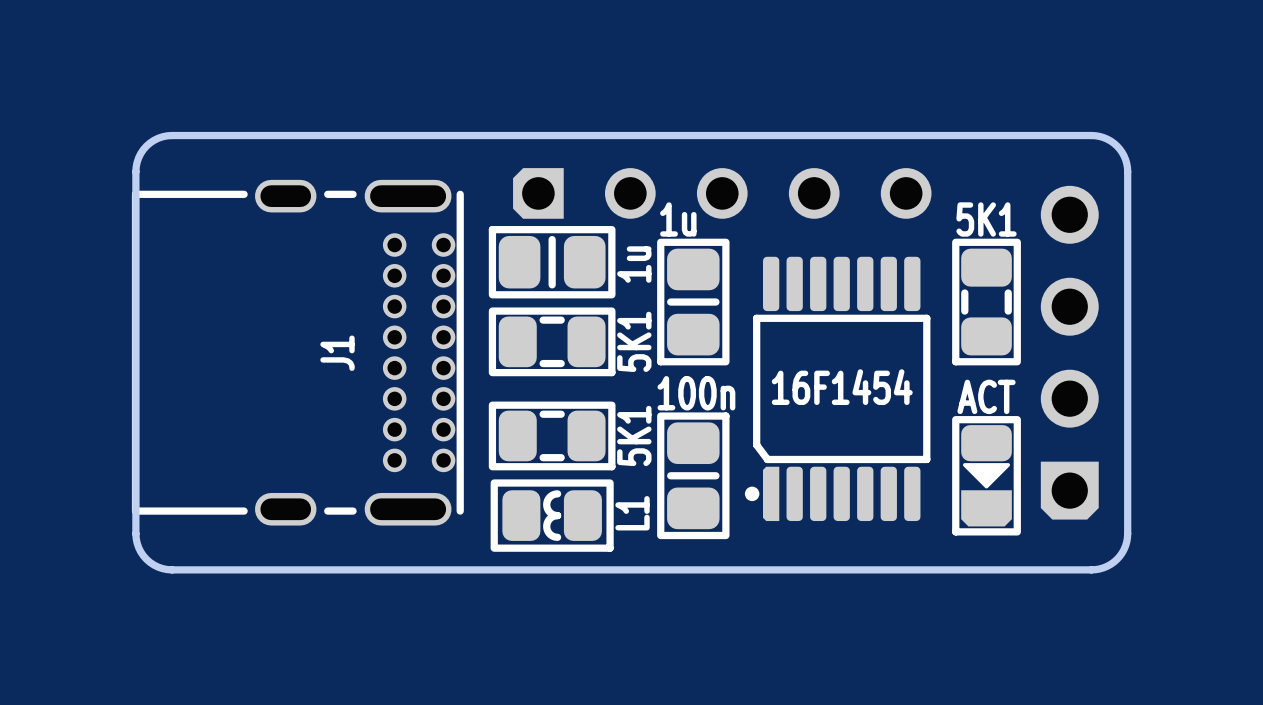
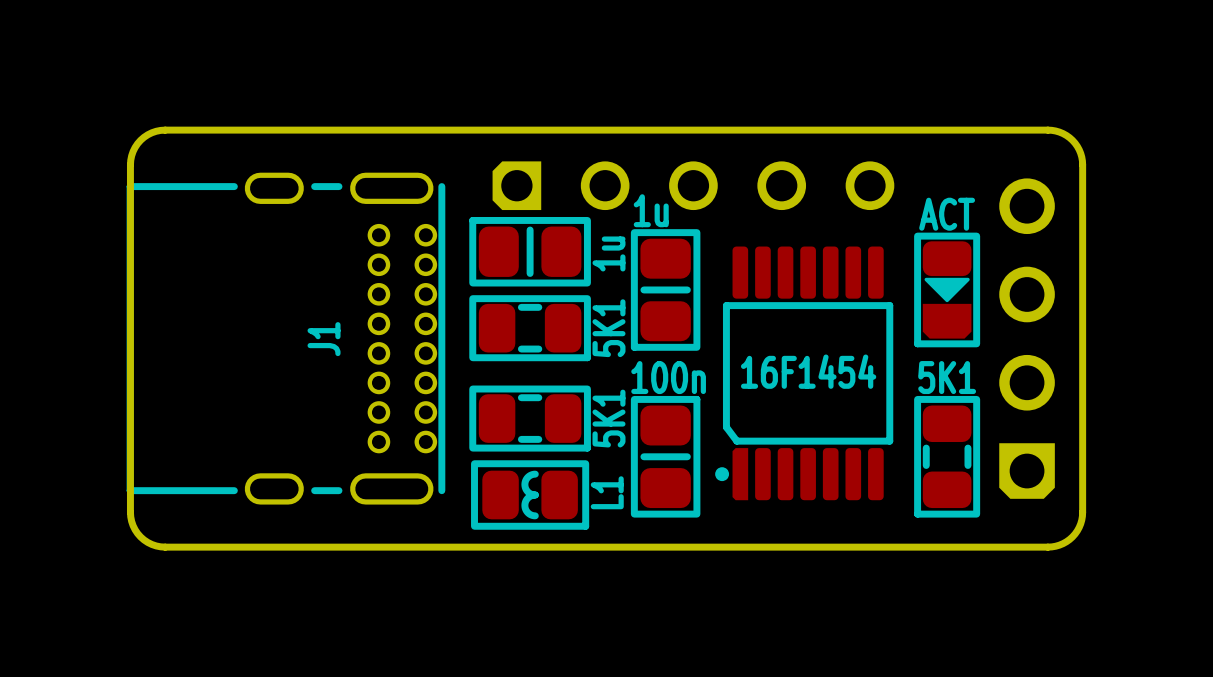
part value: 5K1 (986, 219) -> ACT (947, 214)
part footprint: [952, 238, 1021, 366] -> [914, 232, 981, 348]
part value: ACT (986, 396) -> 5K1 (947, 377)
part footprint: [952, 416, 1021, 536] -> [914, 395, 981, 518]

